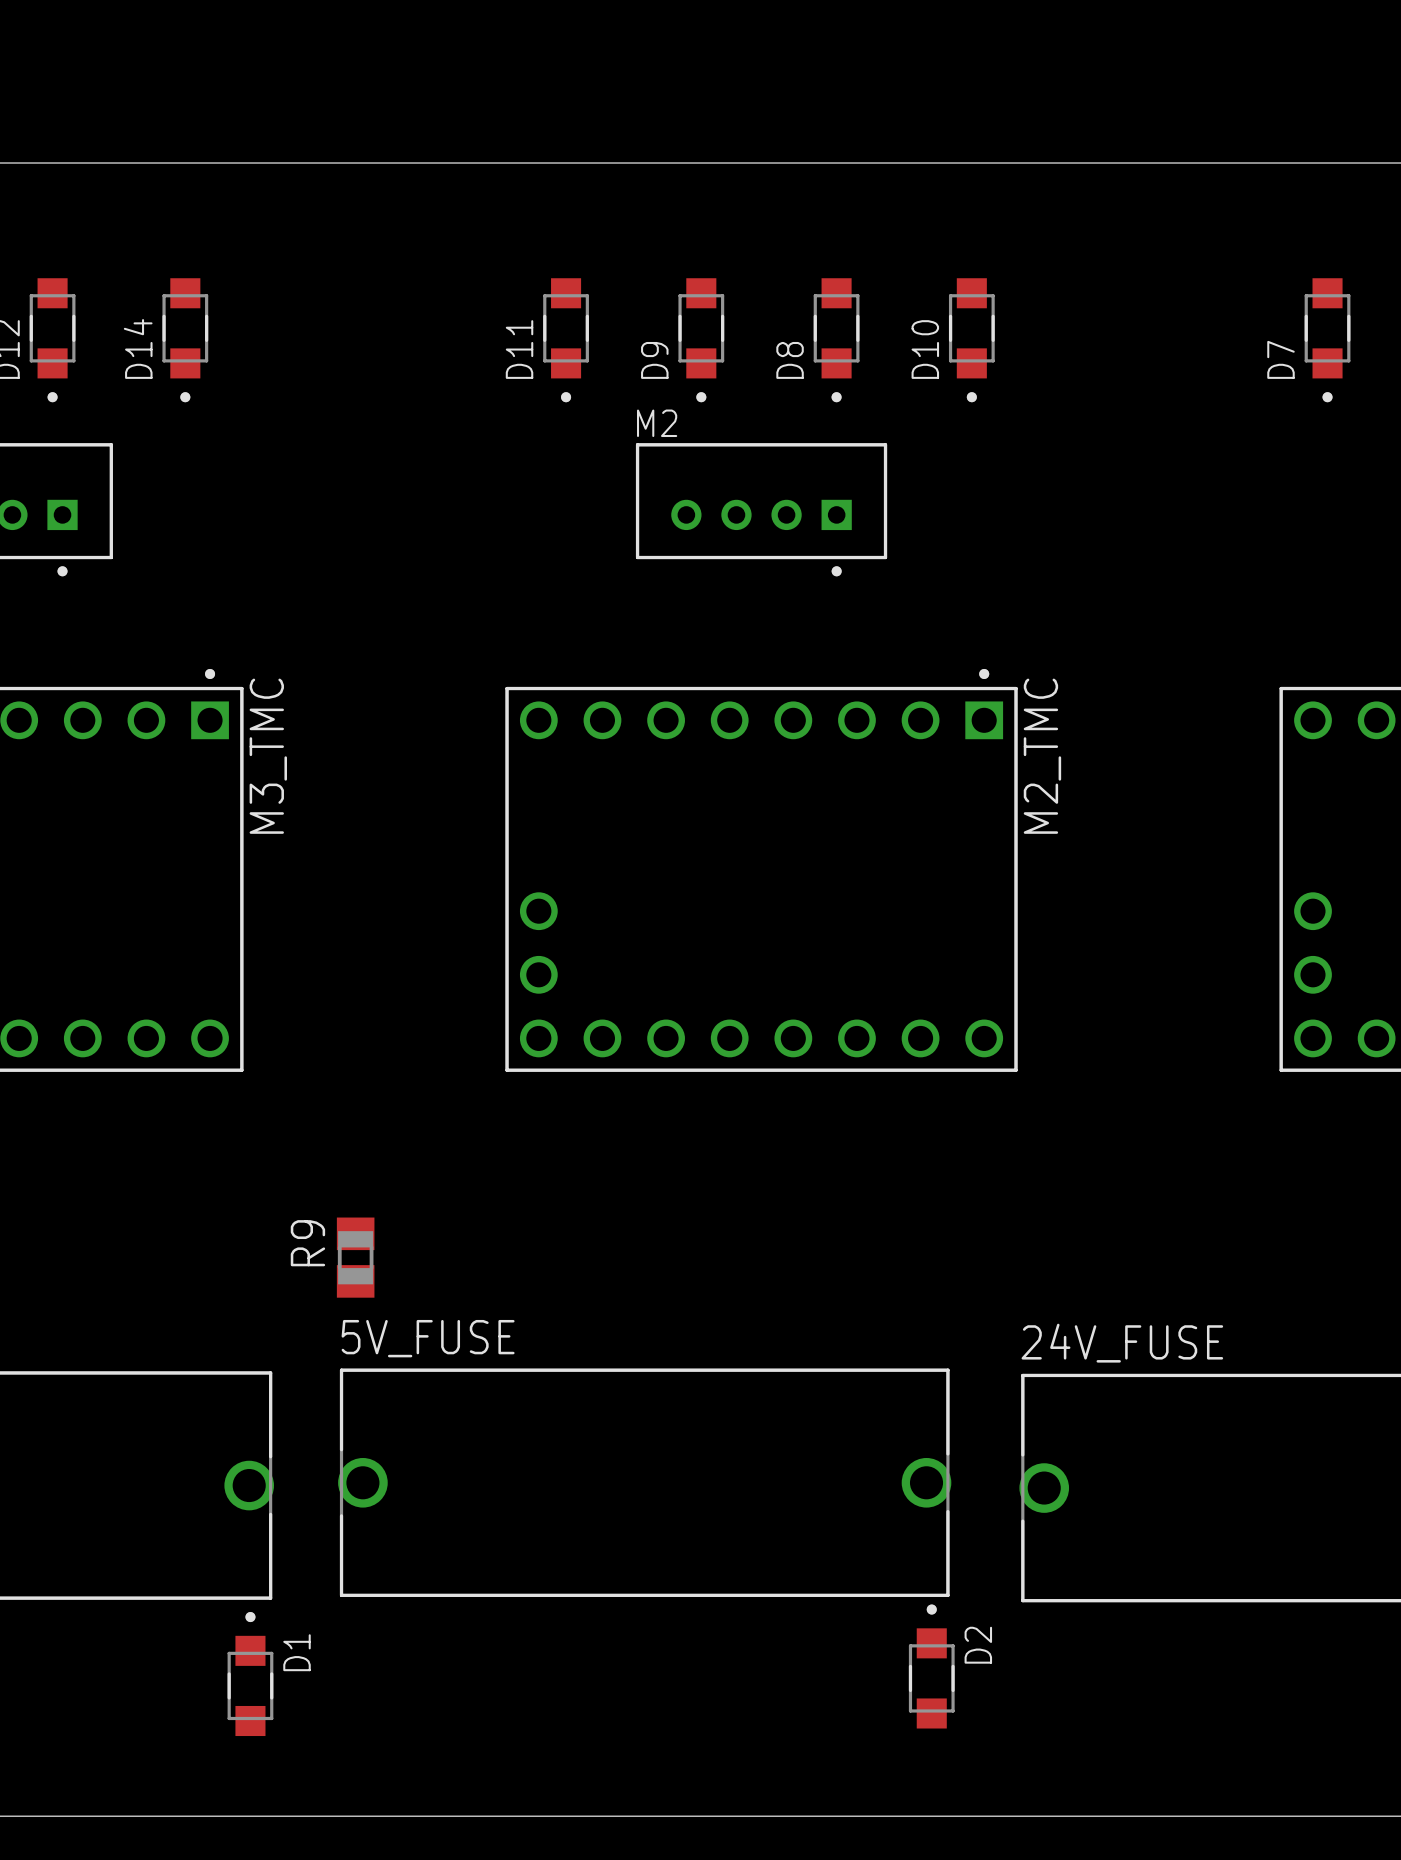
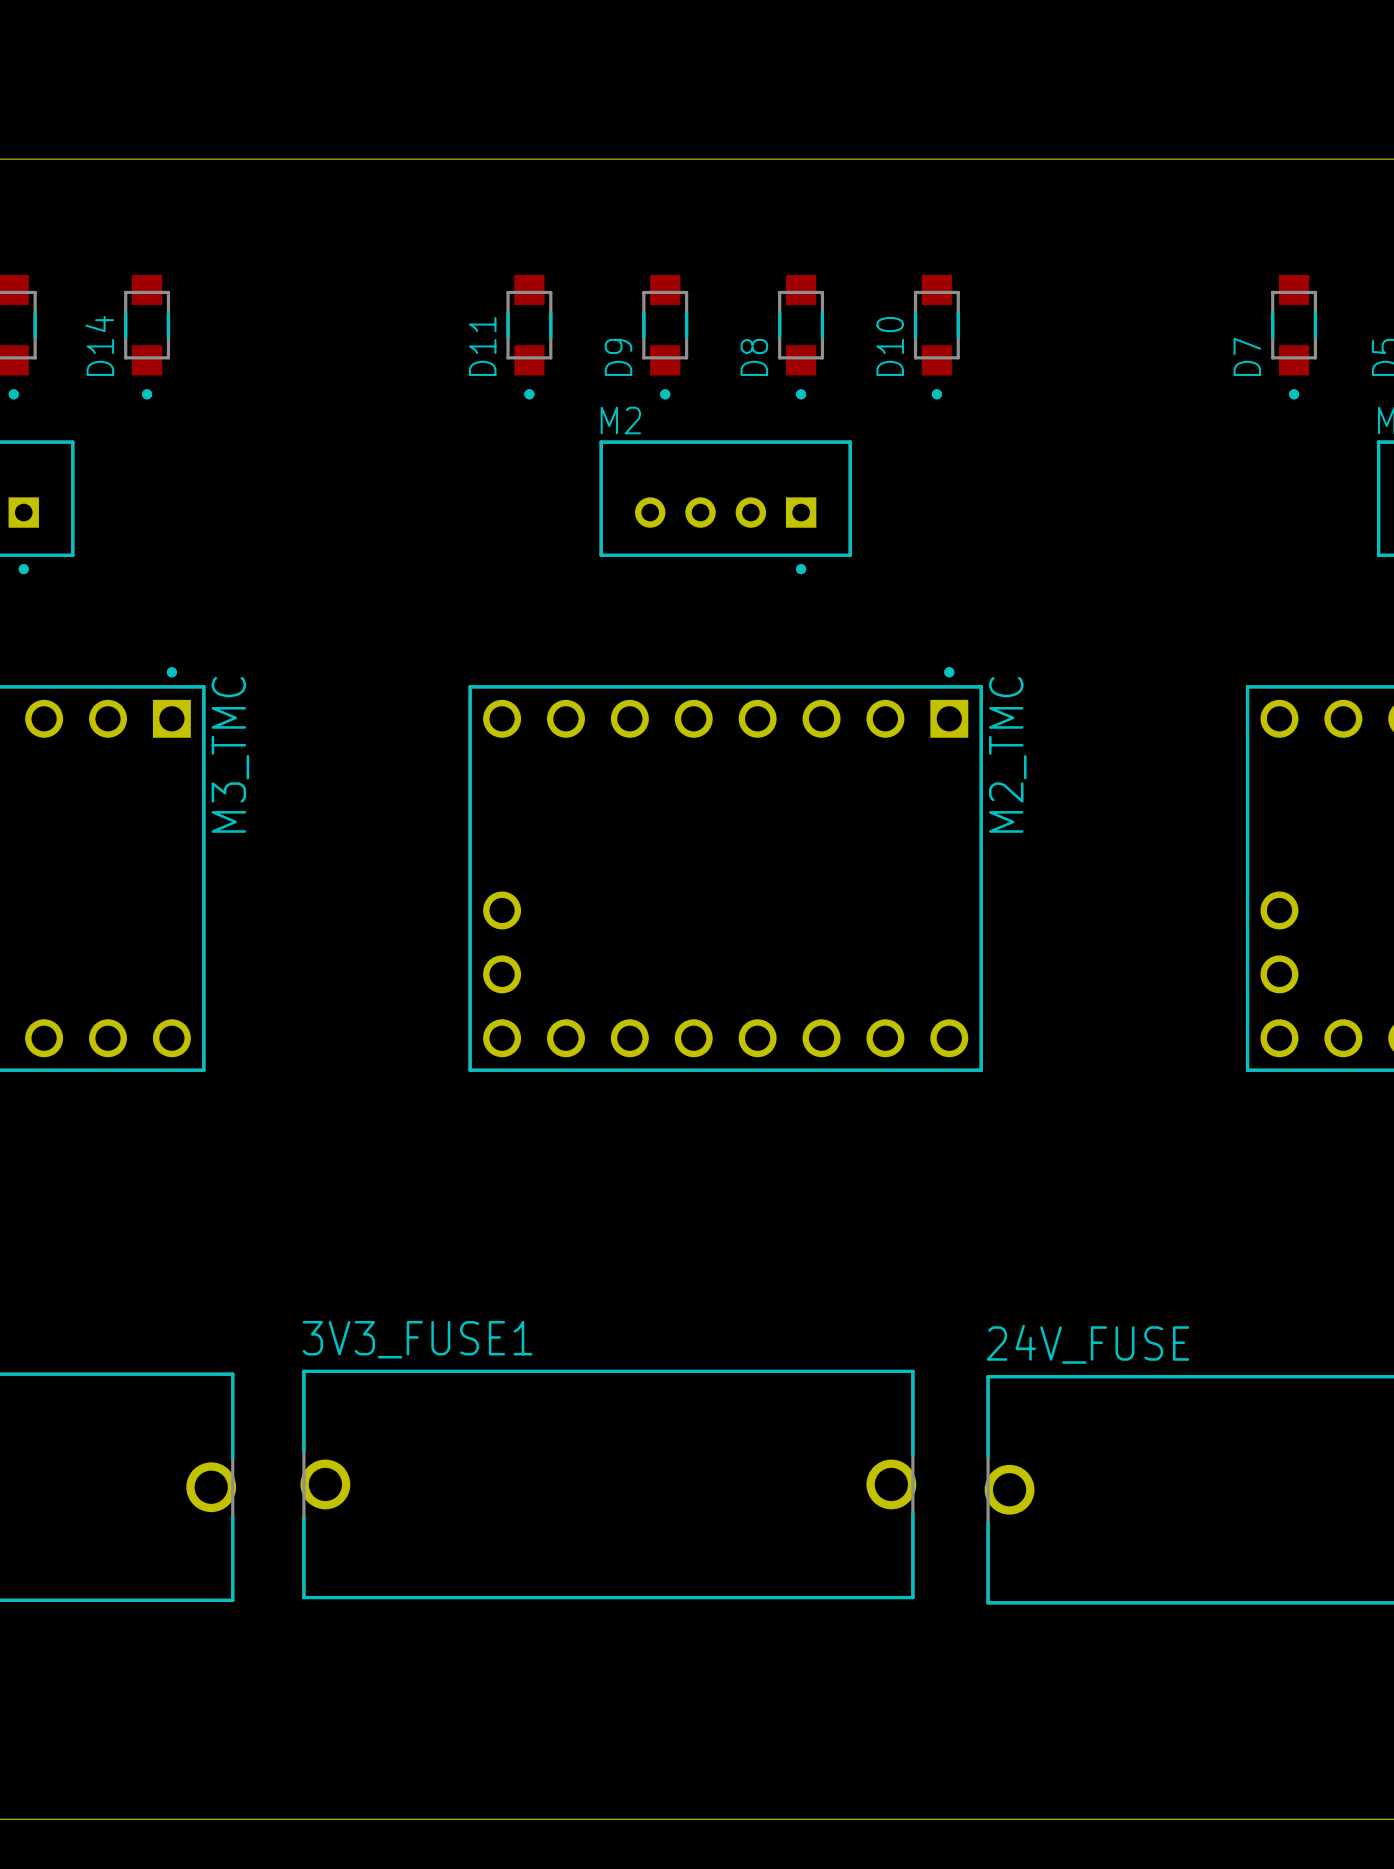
R9: (355, 1257) -> none
5V_FUSE name: 5V_FUSE (428, 1338) -> 3V3_FUSE1 (417, 1339)
D2: (931, 1666) -> none
D1: (250, 1674) -> none

